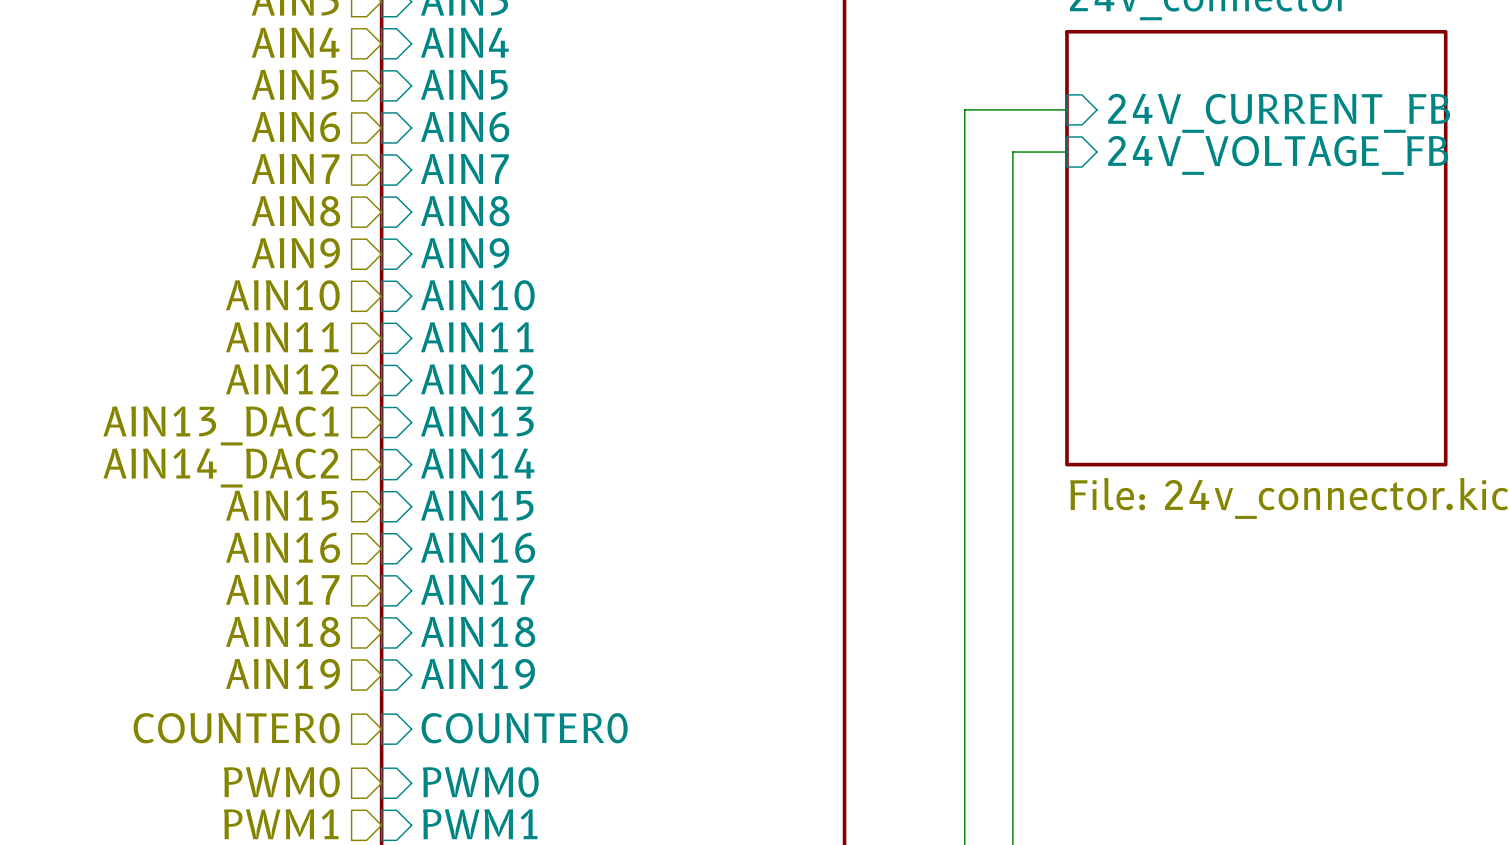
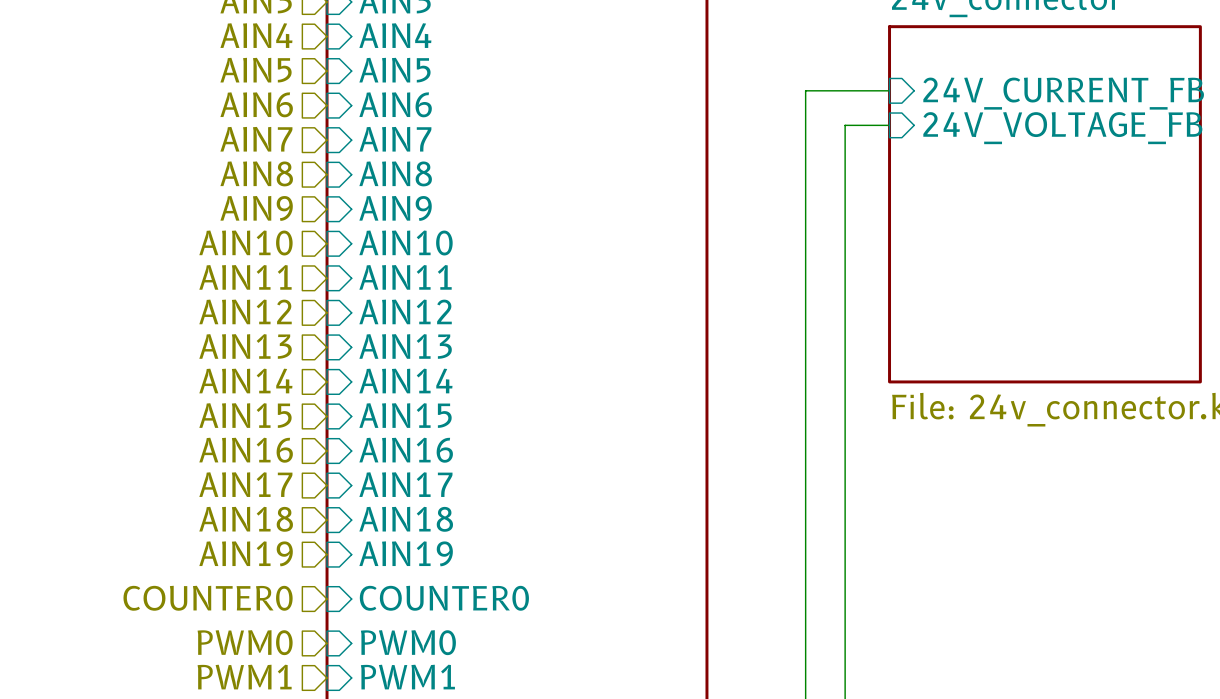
hierarchical label: AIN13_DAC1 (220, 425) -> AIN13 (245, 346)
hierarchical label: AIN14_DAC2 (221, 468) -> AIN14 (245, 381)

